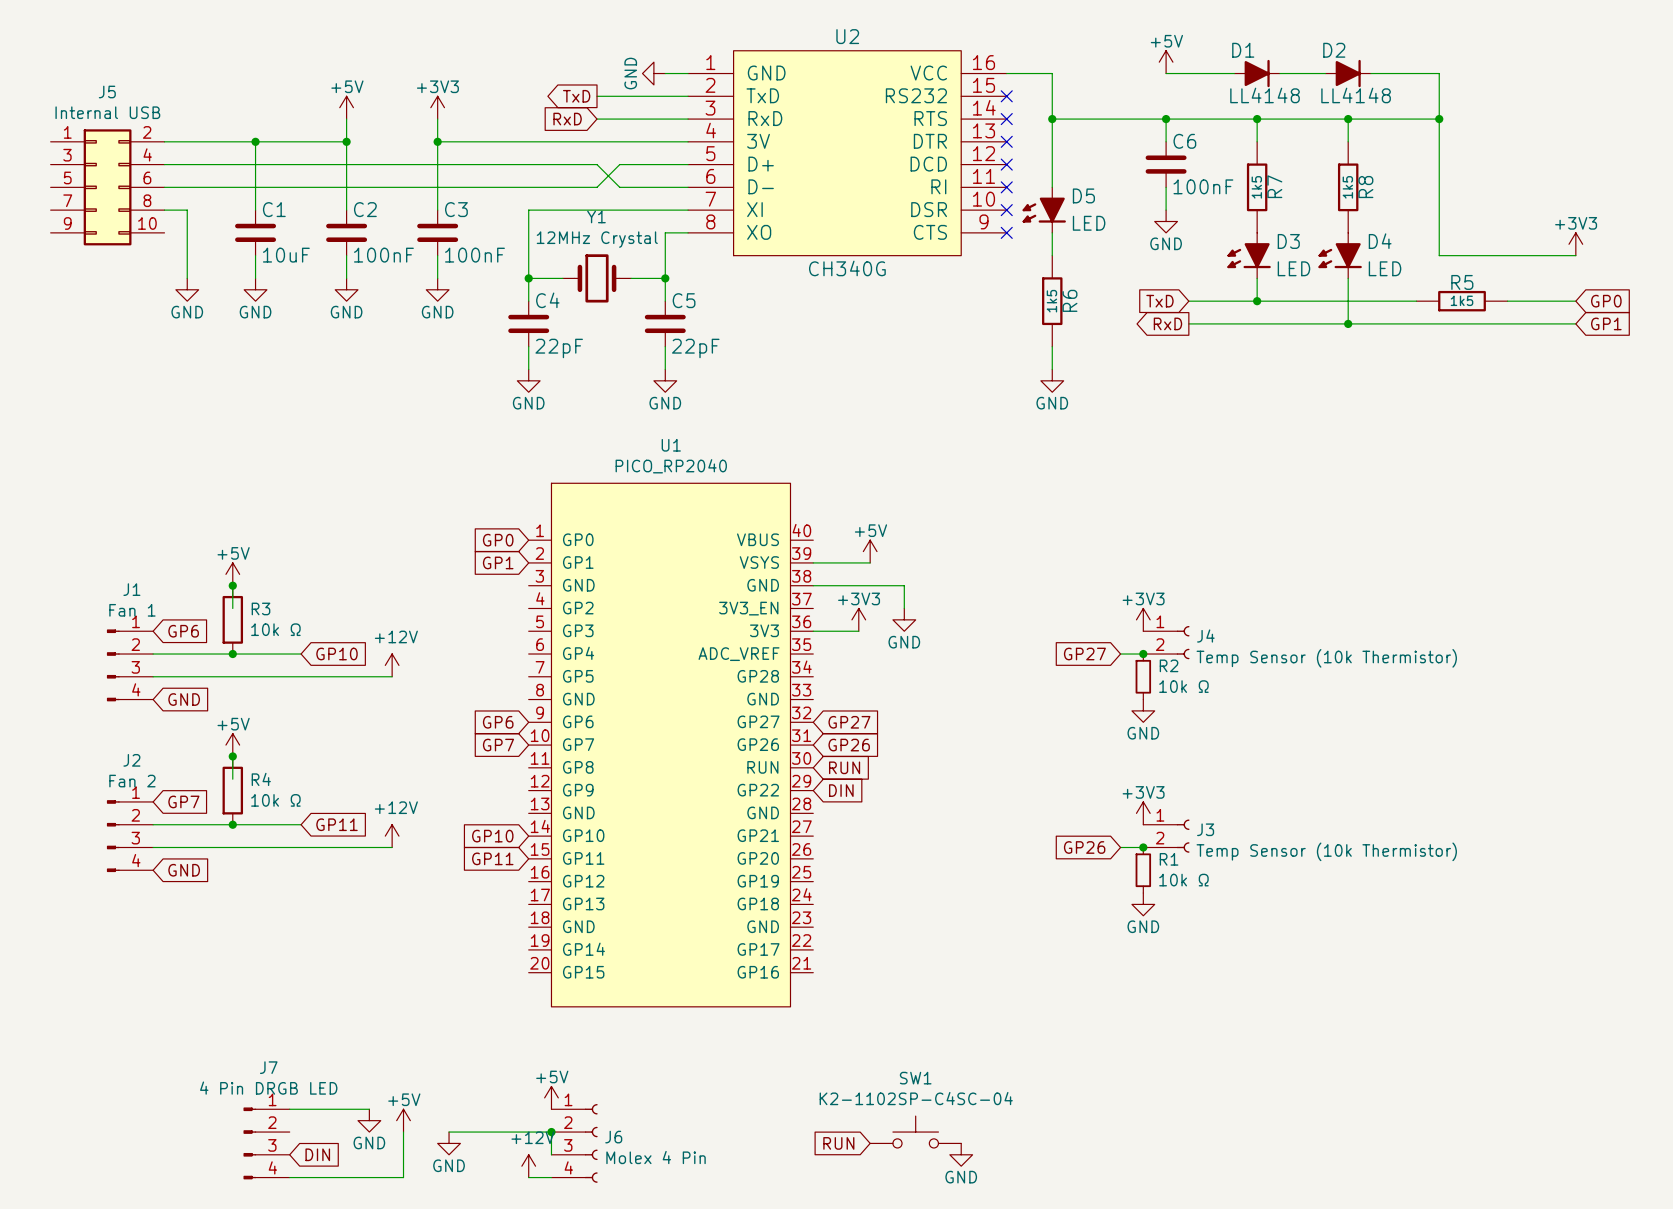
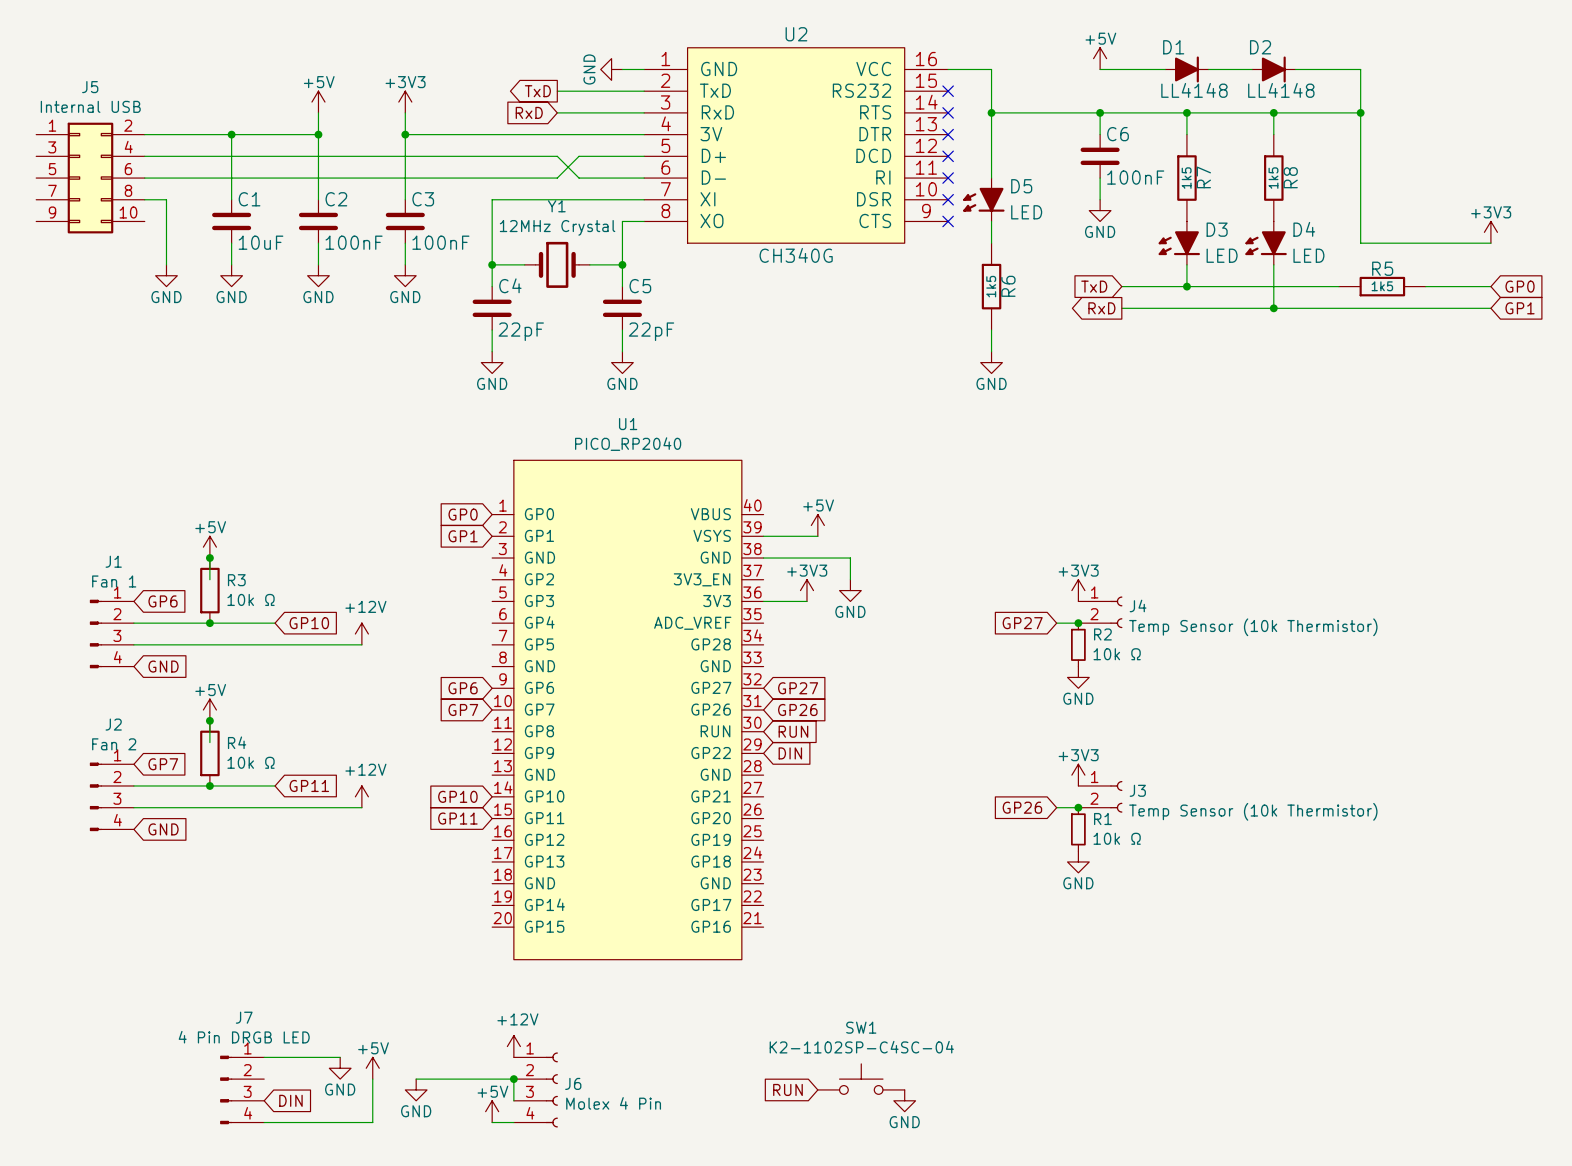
power symbol: +5V (551, 1097) -> +12V (513, 1046)
power symbol: +12V (528, 1166) -> +5V (492, 1111)

